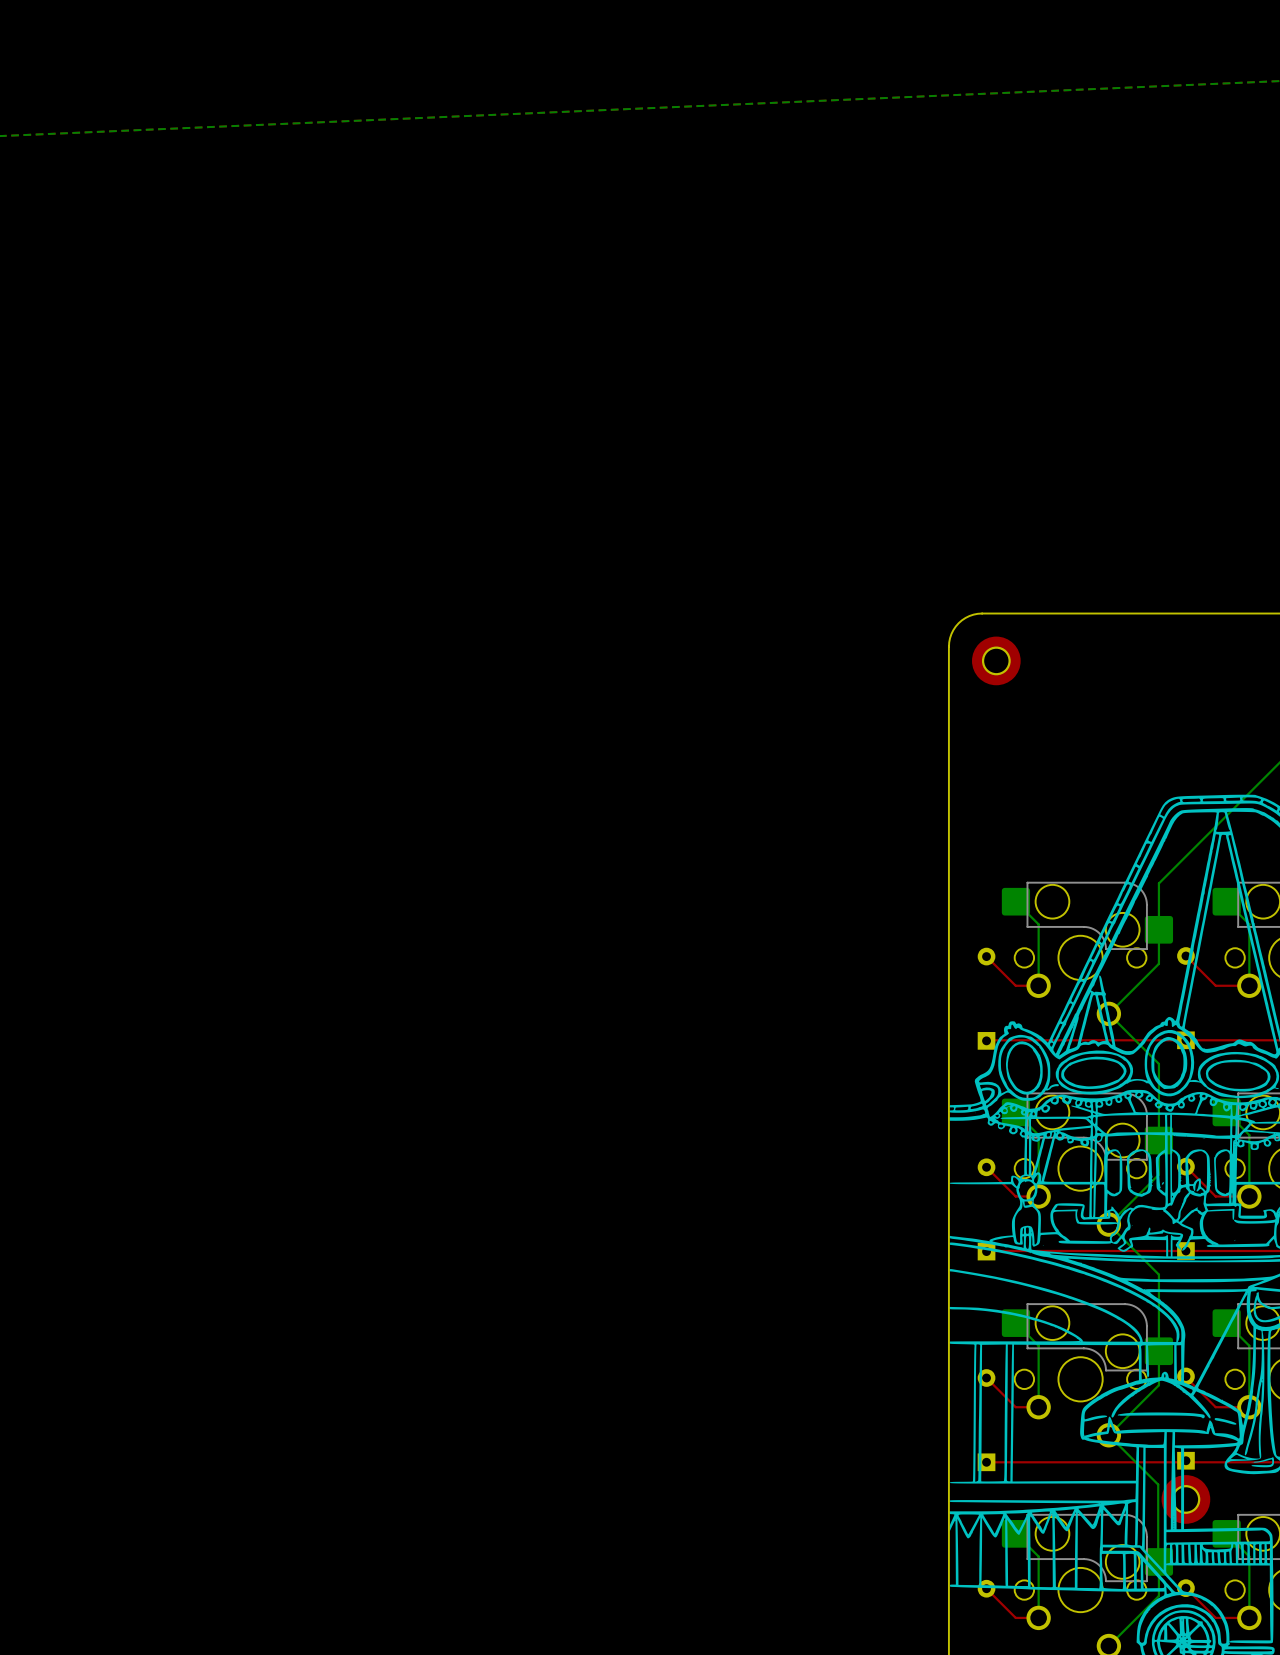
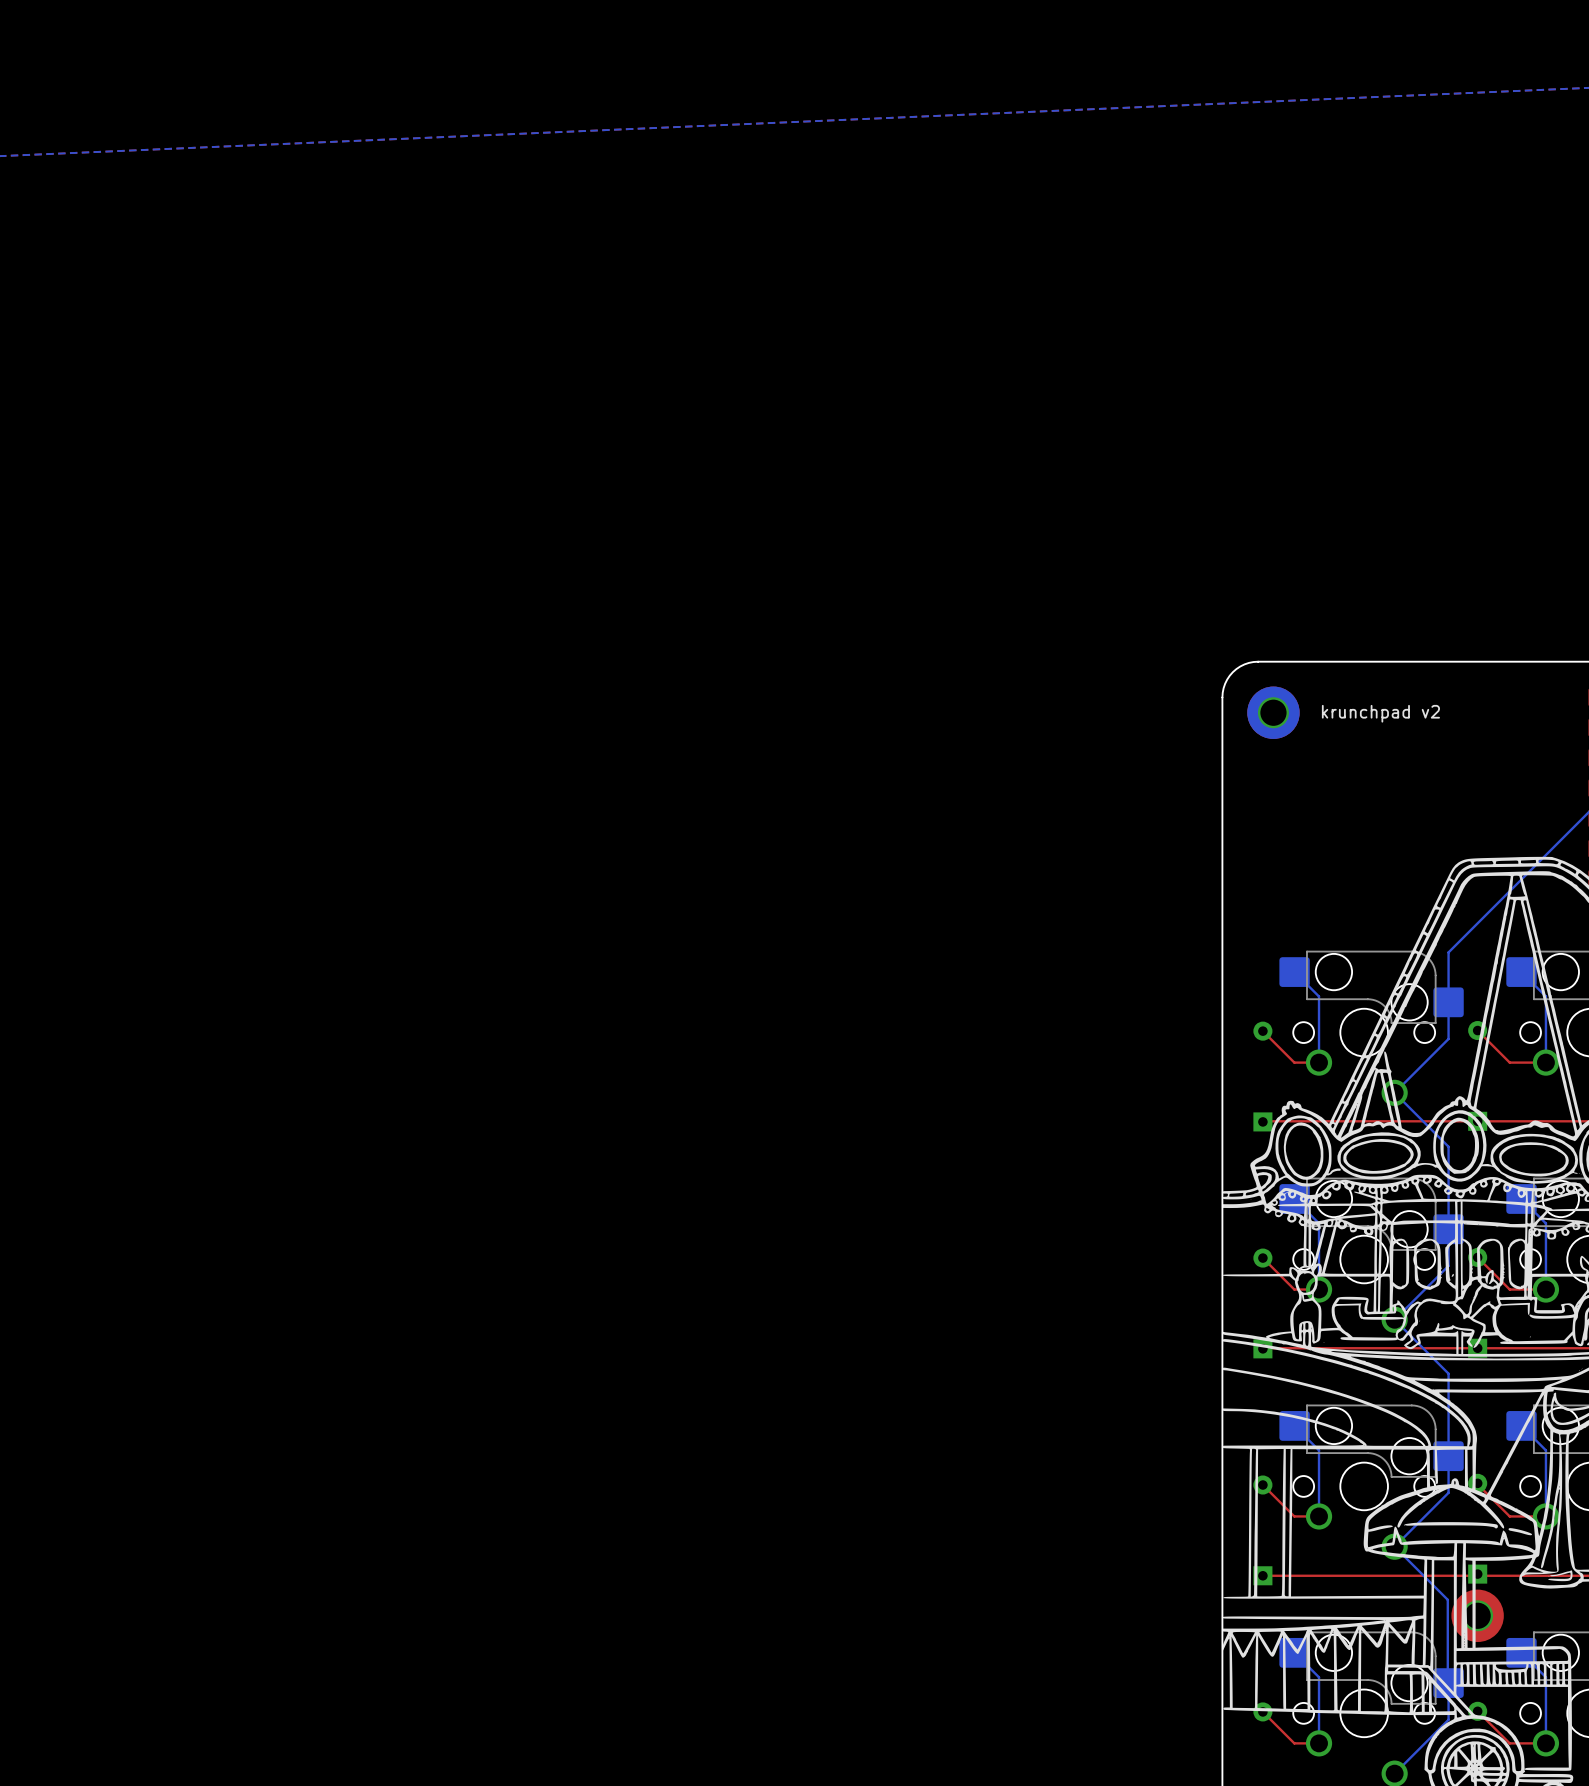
part footprint: [972, 636, 1021, 686] -> [1247, 686, 1300, 739]
text: none -> krunchpad v2 (1380, 713)

